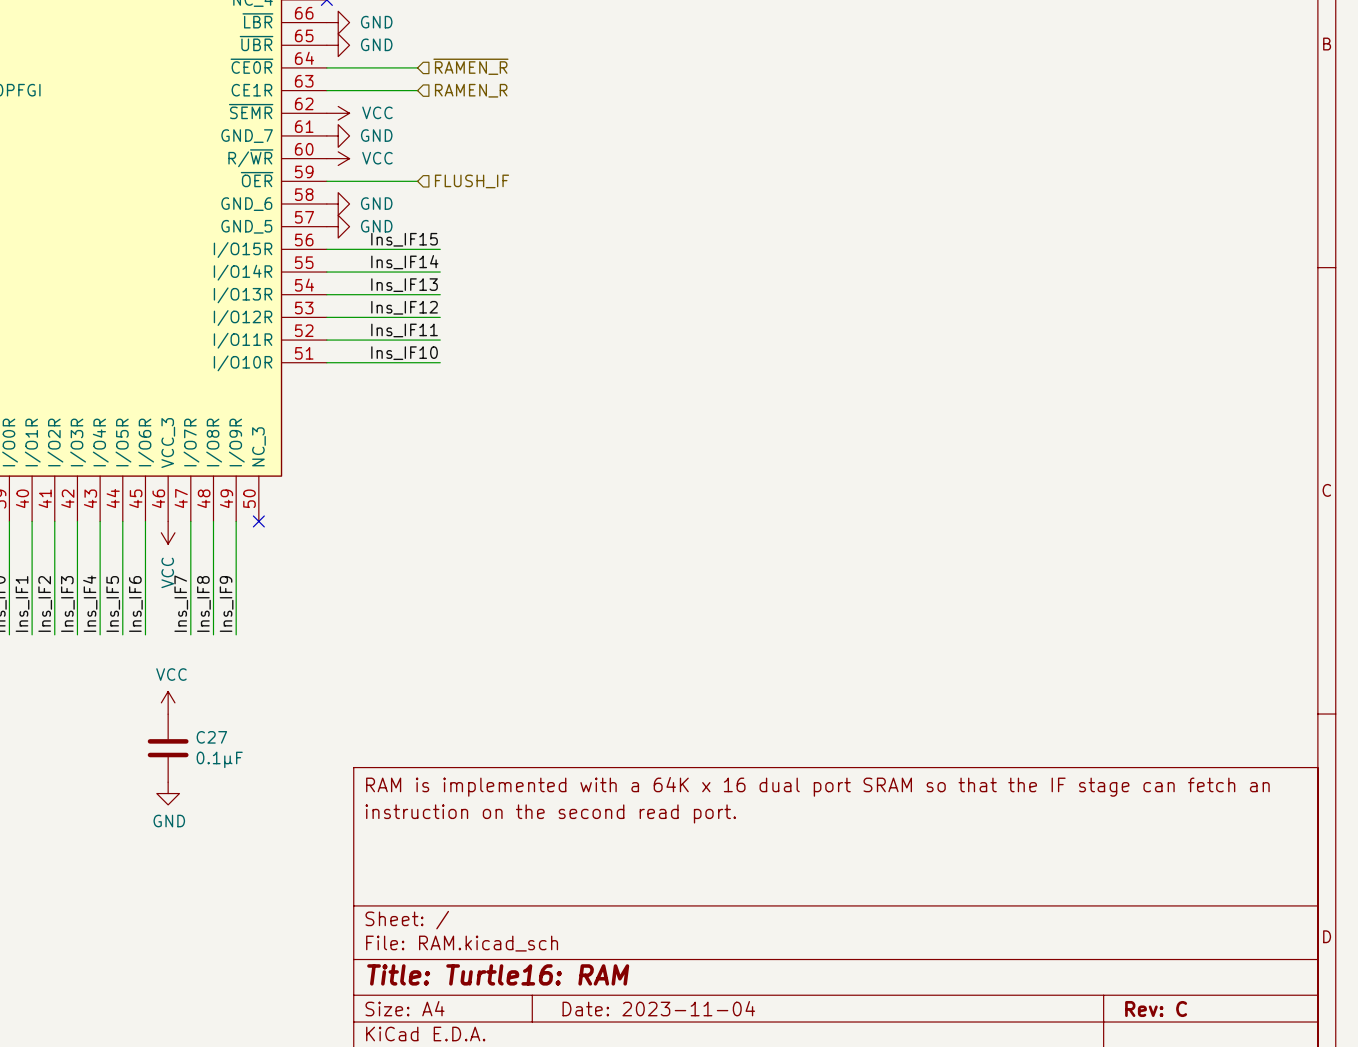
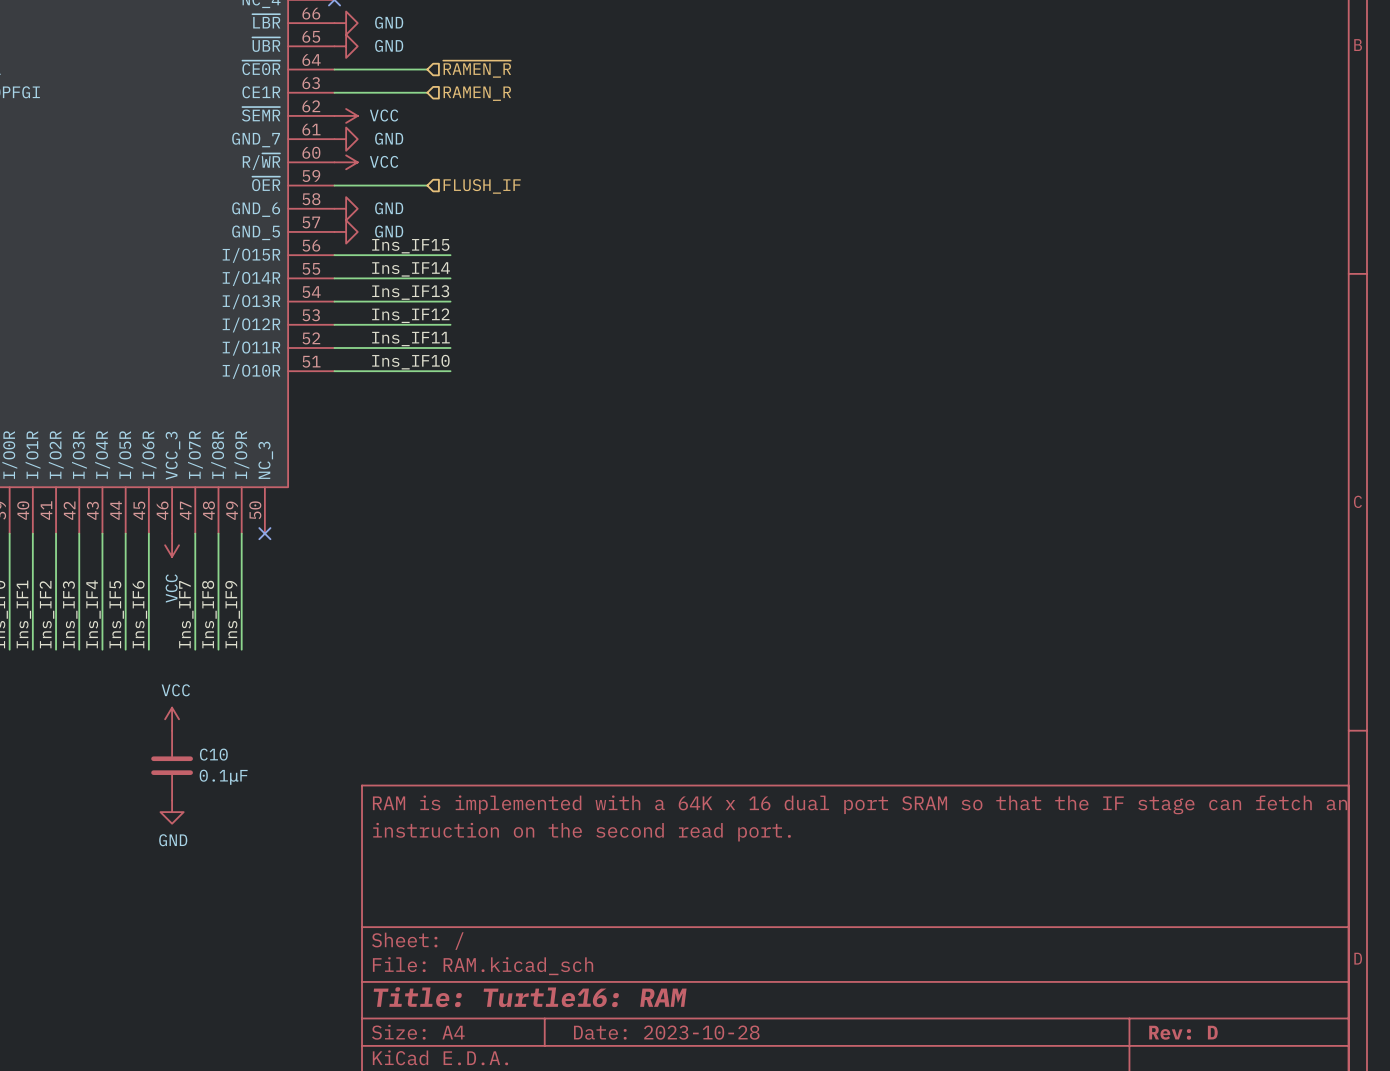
C27 name: C27 (211, 737) -> C10 (213, 754)
title block: Date: 2023-11-04 (658, 1008) -> Date: 2023-10-28 (666, 1032)
title block: Rev: C (1156, 1009) -> Rev: D (1183, 1032)

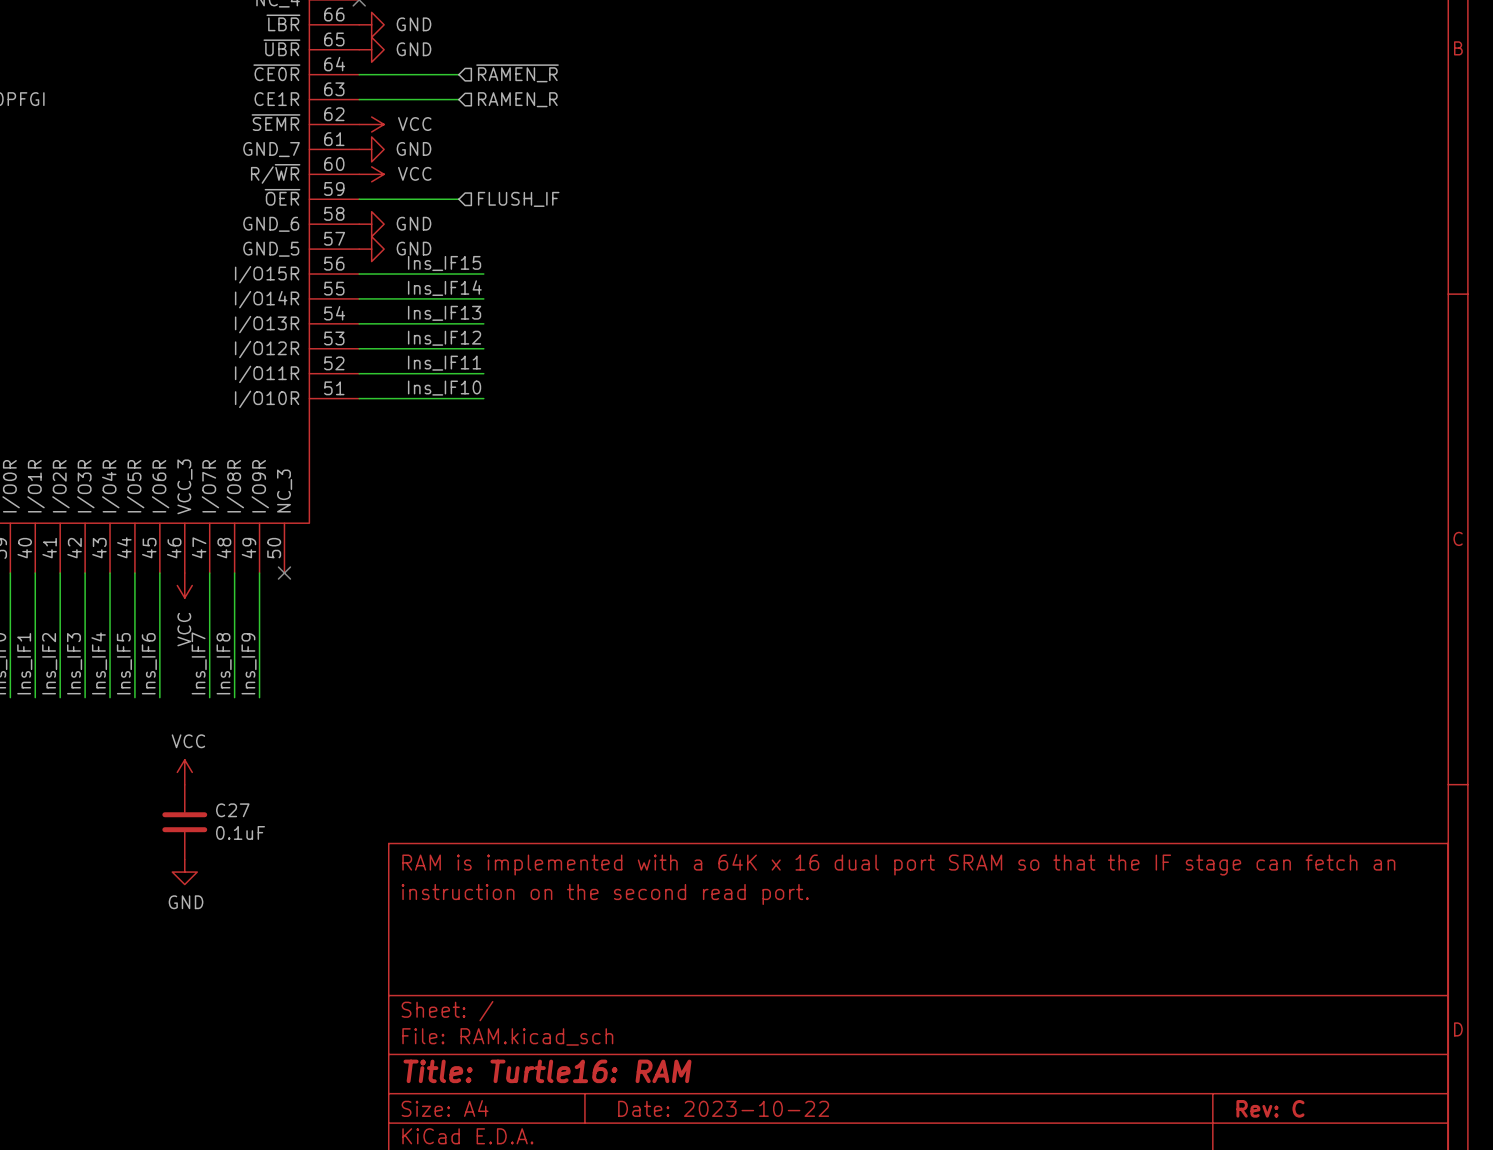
C10 name: C10 (213, 754) -> C27 (232, 810)
C10 value: 0.1μF (223, 777) -> 0.1uF (240, 832)
title block: Date: 2023-10-28 (666, 1032) -> Date: 2023-10-22 (723, 1108)
title block: Rev: D (1183, 1032) -> Rev: C (1270, 1108)

